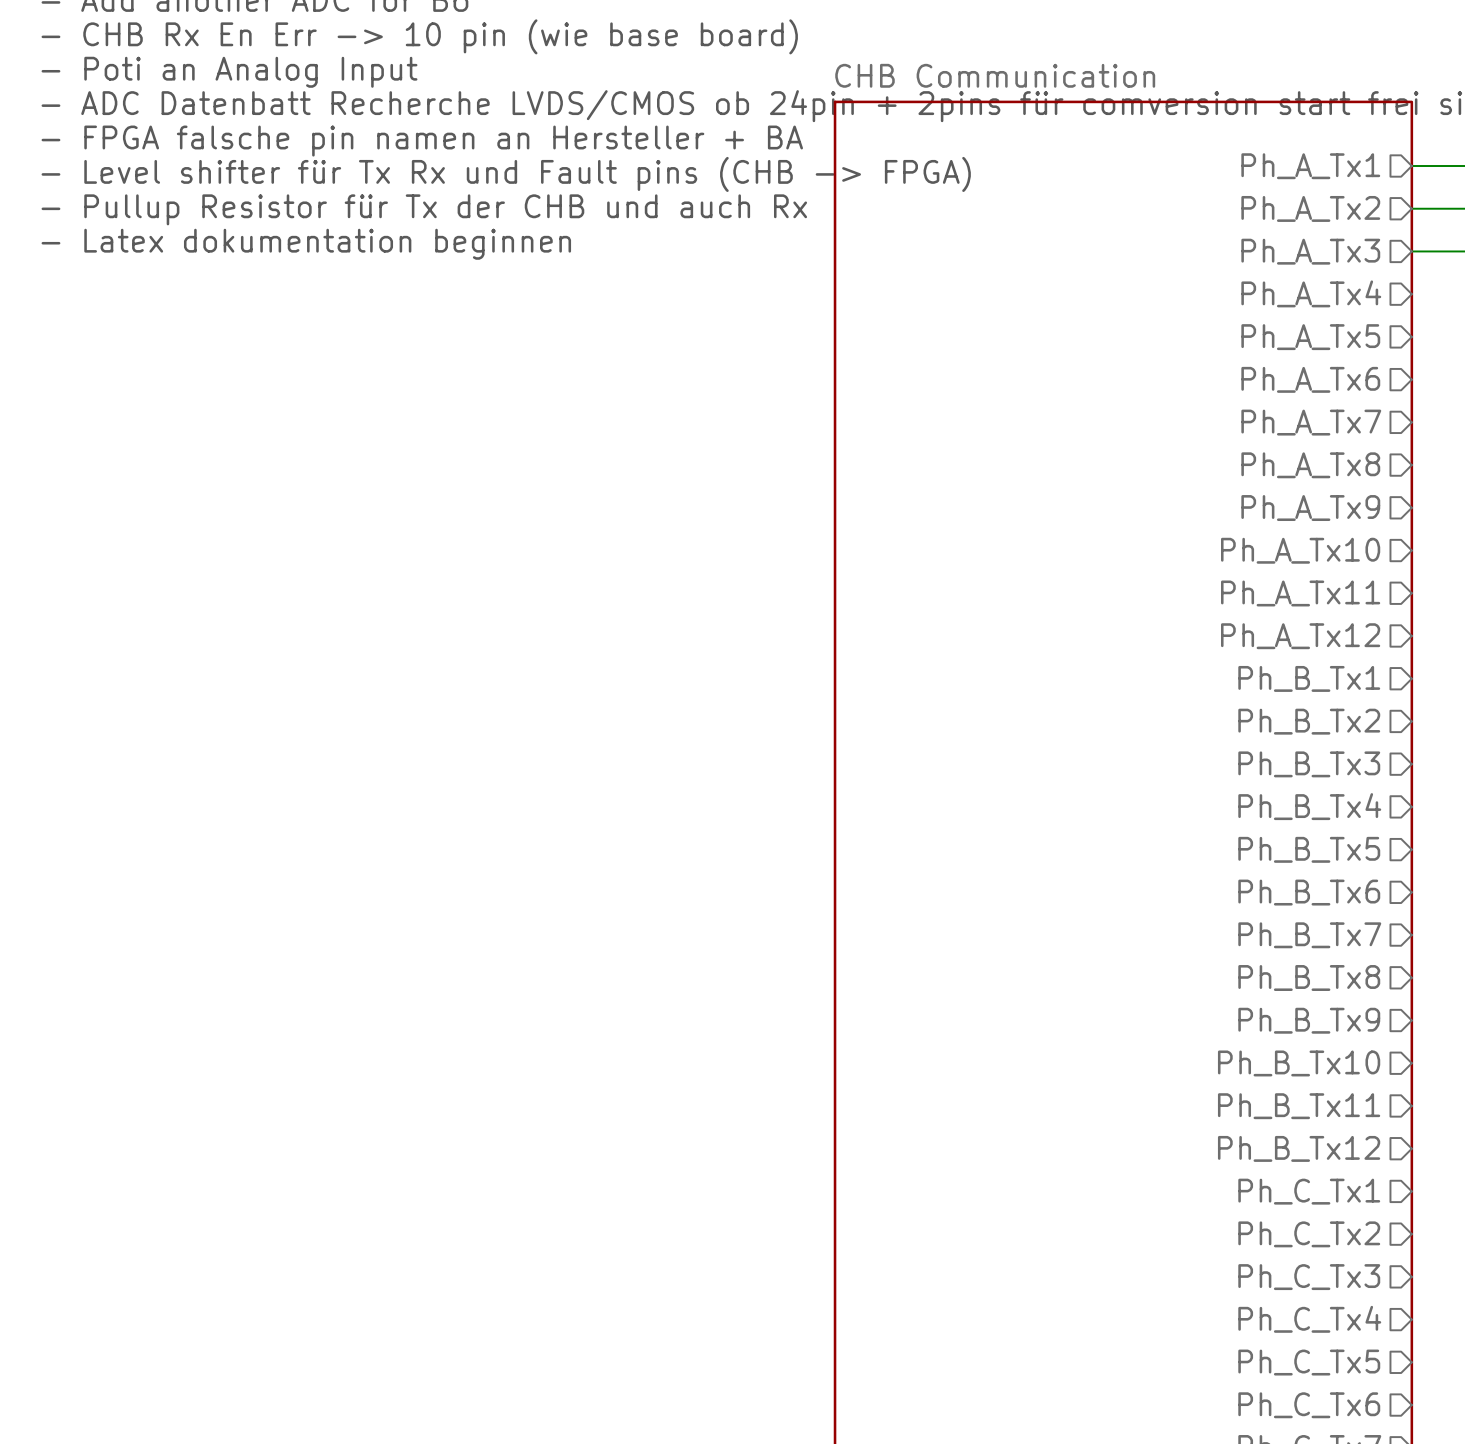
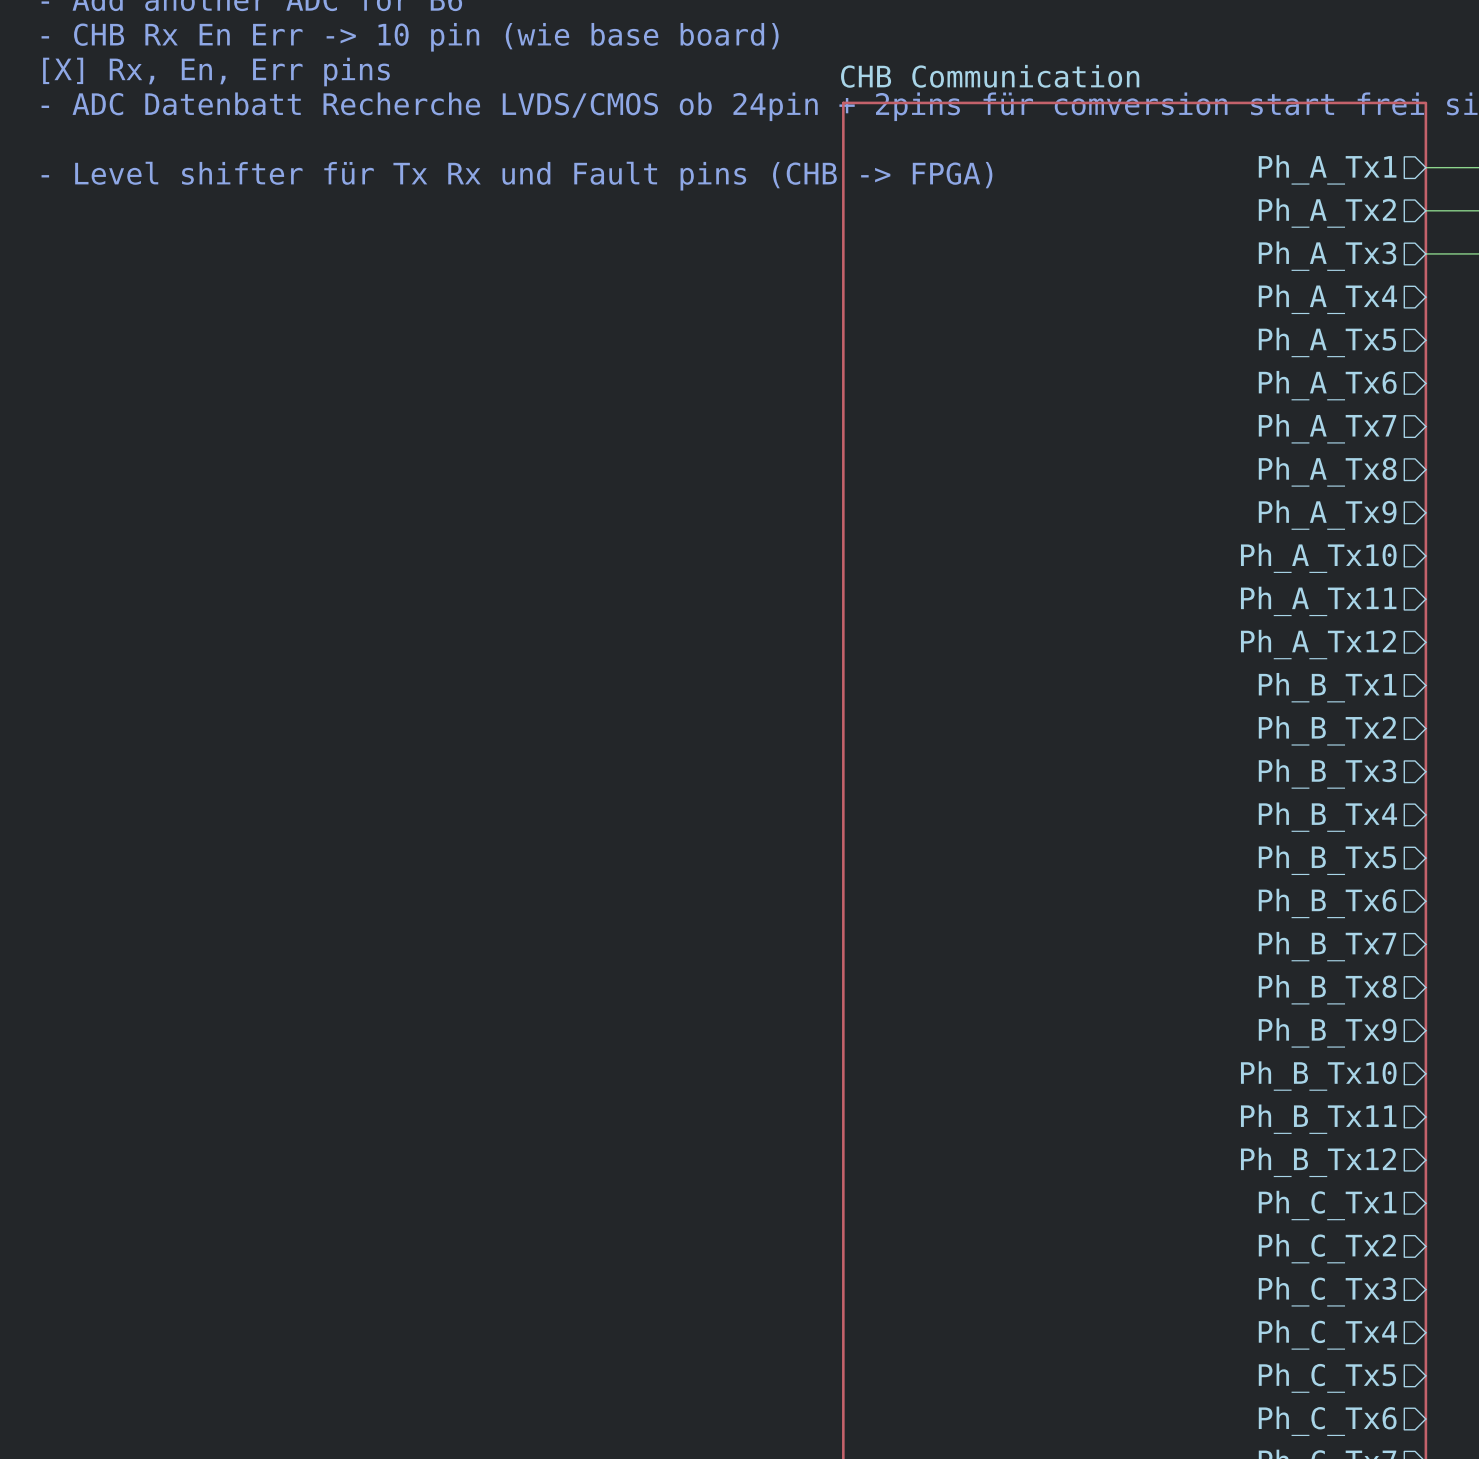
text: - Poti an Analog Input (229, 72) -> [X] Rx, En, Err pins (216, 72)
text: - FPGA falsche pin namen an Hersteller + BA (422, 141) -> none
text: - Pullup Resistor für Tx der CHB und auch Rx (424, 209) -> none
text: - Latex dokumentation beginnen (306, 244) -> none

